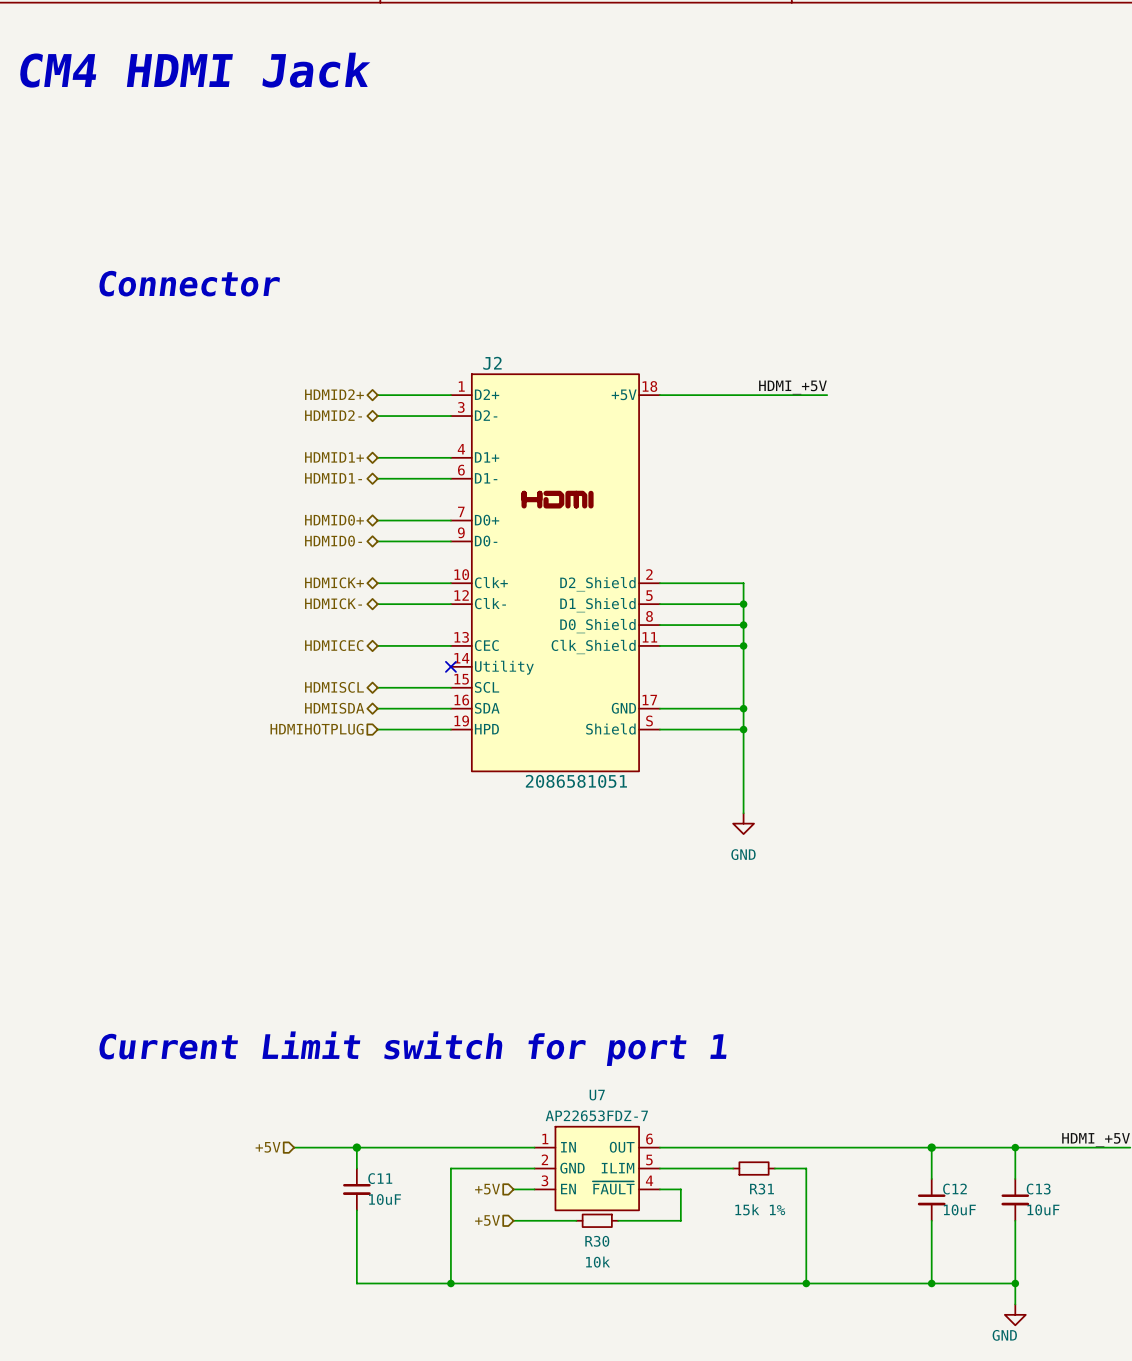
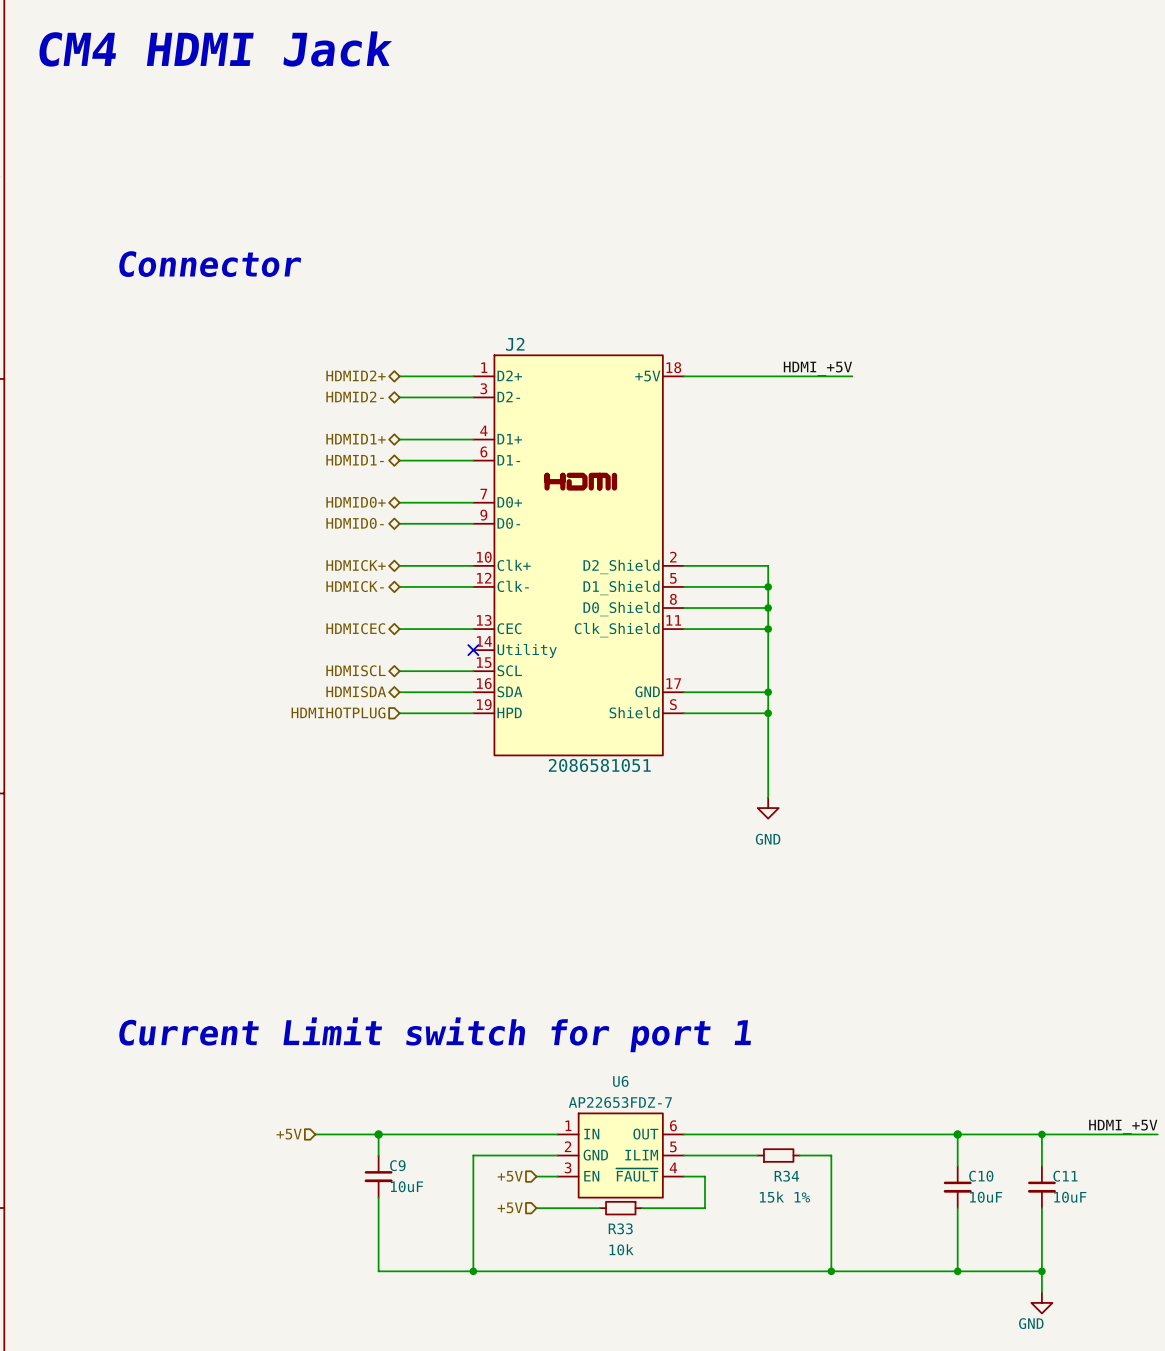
U7 name: U7 (597, 1095) -> U6 (620, 1081)
C11 name: C11 (380, 1178) -> C9 (397, 1165)
R31 name: R31 (762, 1189) -> R34 (786, 1176)
C12 name: C12 (954, 1189) -> C10 (981, 1176)
C13 name: C13 (1038, 1189) -> C11 (1065, 1176)
R30 name: R30 (597, 1241) -> R33 (620, 1228)

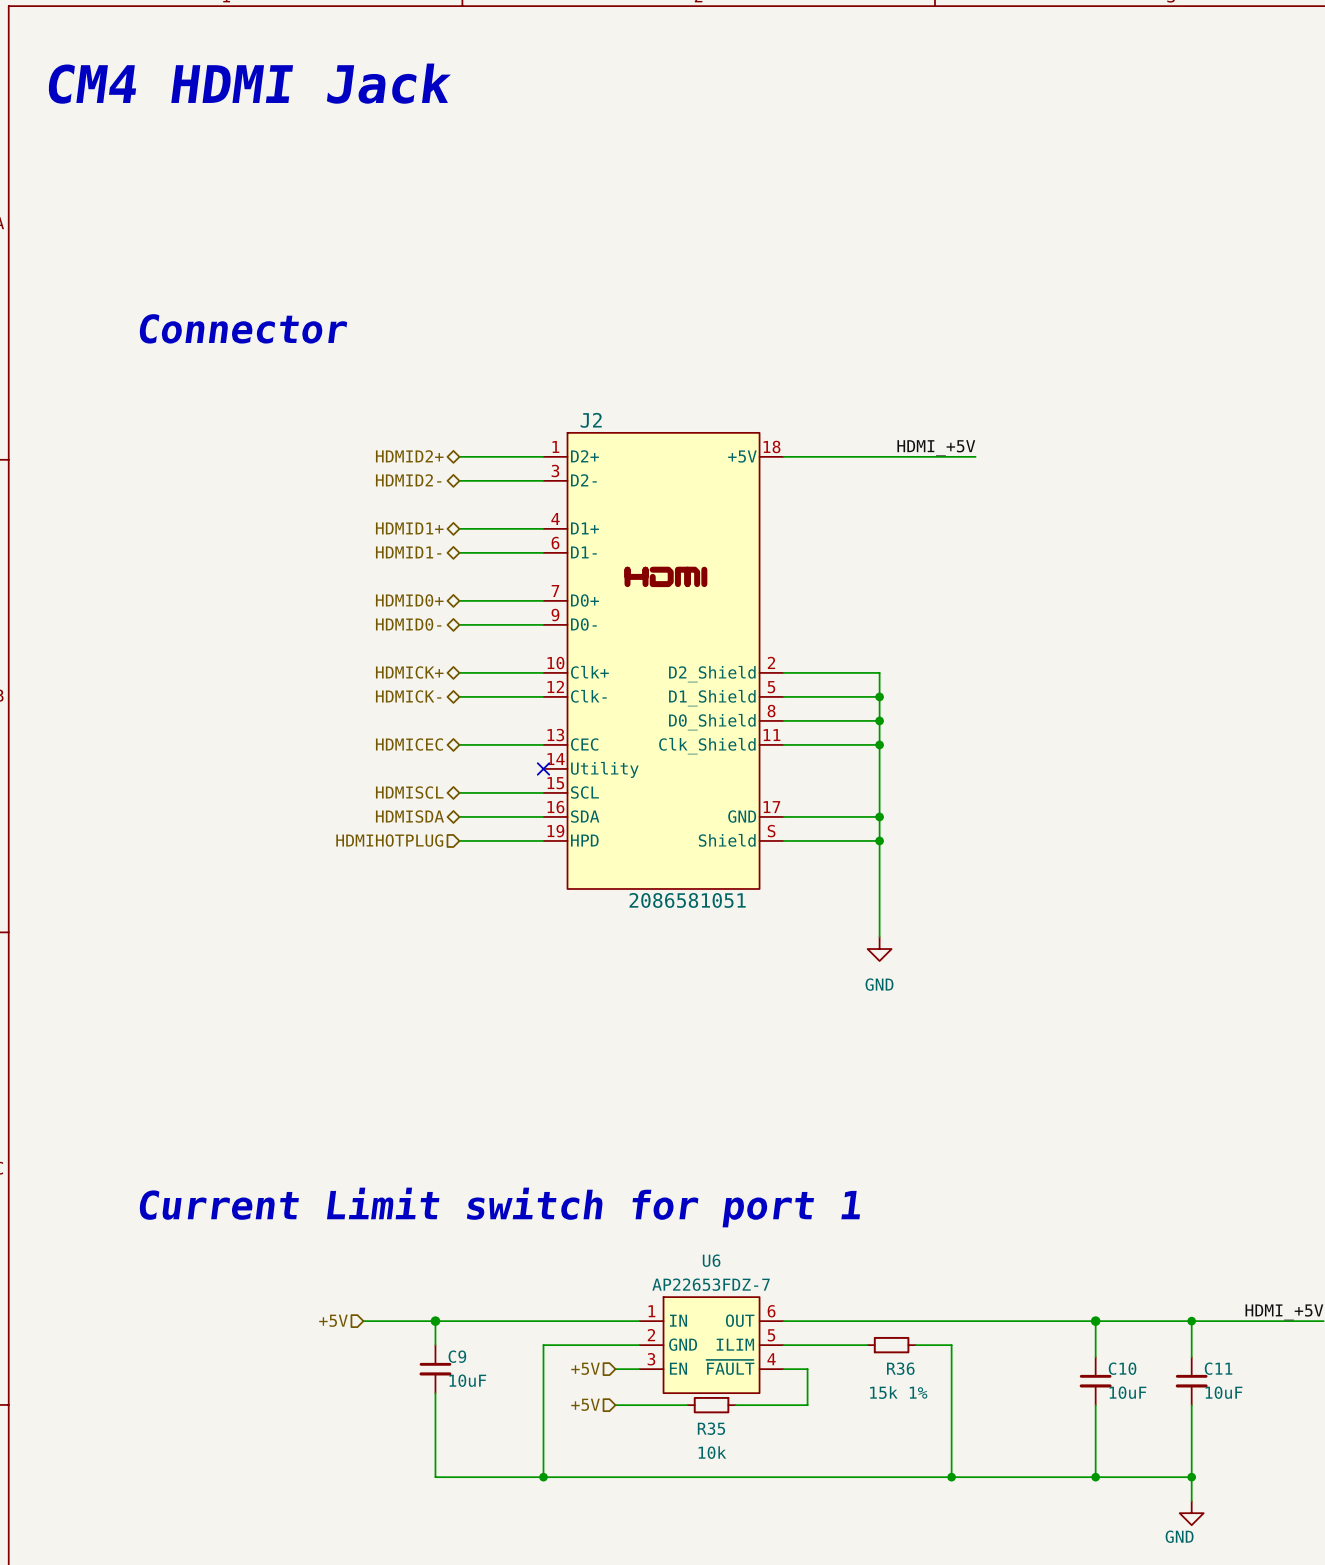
R34 name: R34 (786, 1176) -> R36 (900, 1368)
R33 name: R33 (620, 1228) -> R35 (711, 1428)

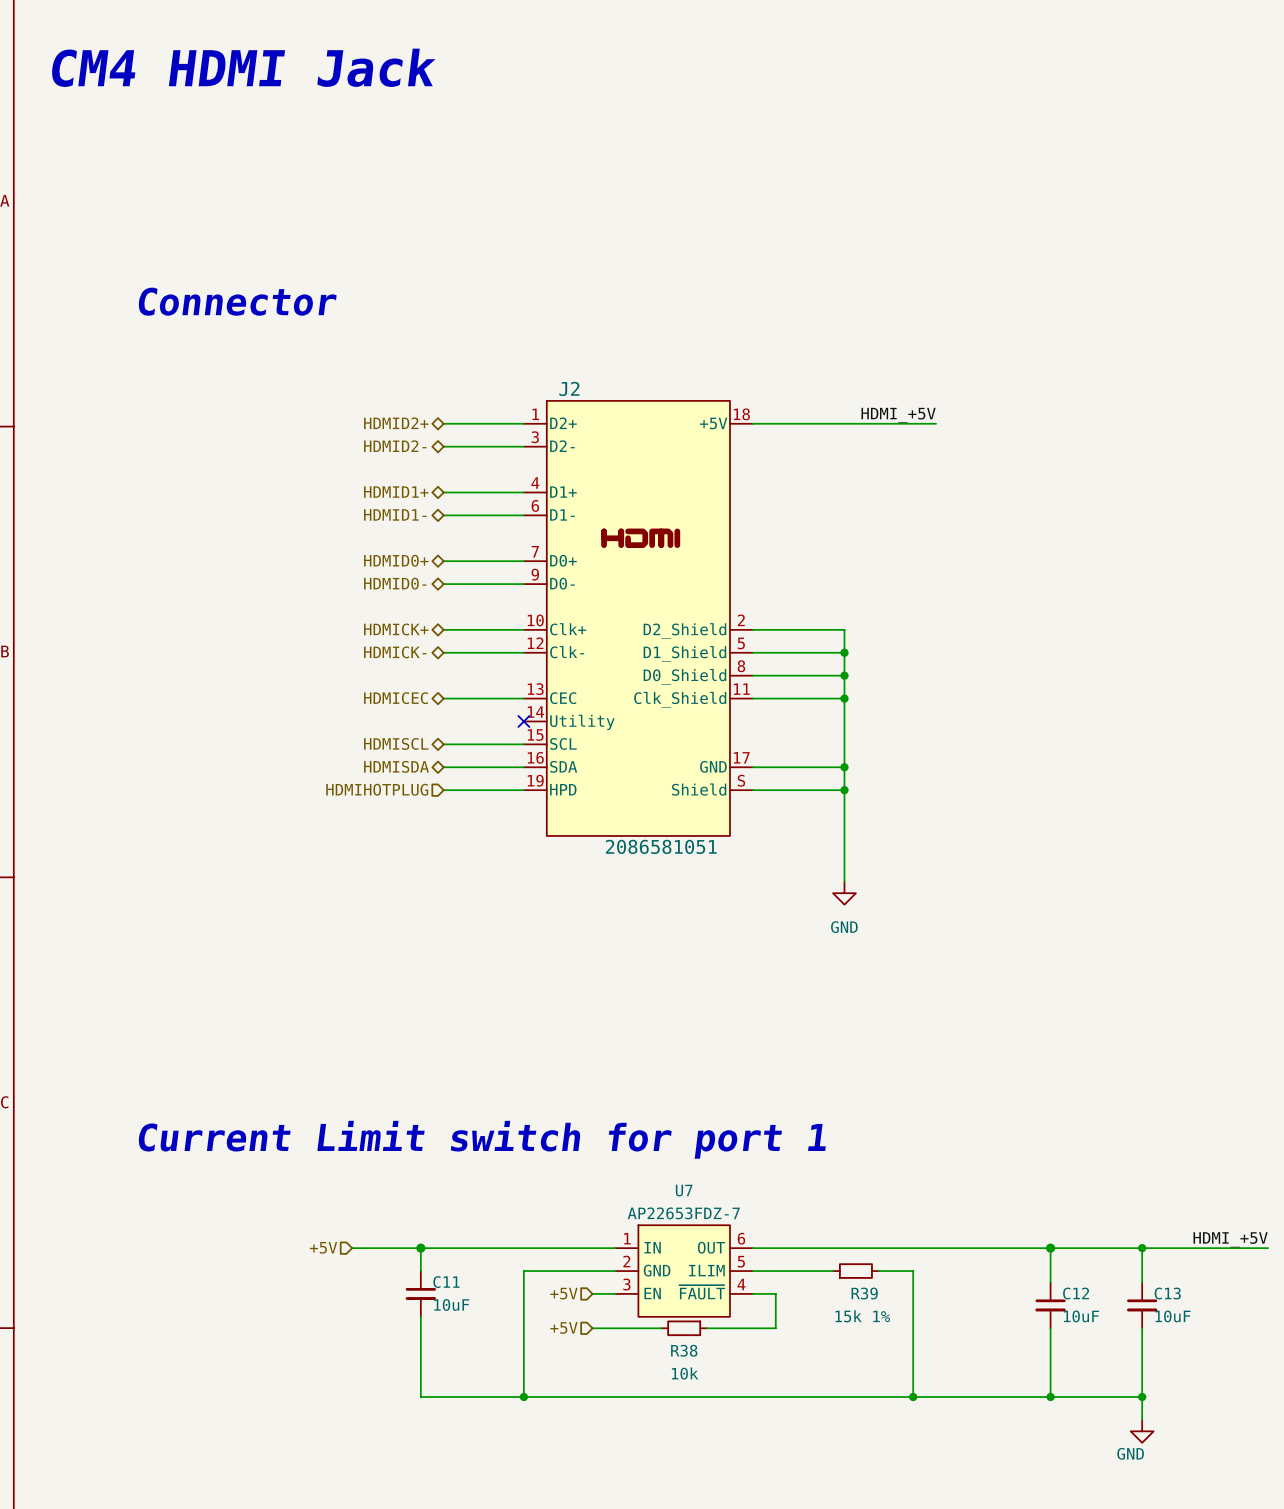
U6 name: U6 (711, 1260) -> U7 (684, 1190)
C9 name: C9 (457, 1356) -> C11 (446, 1282)
R36 name: R36 (900, 1368) -> R39 (864, 1293)
C10 name: C10 (1122, 1368) -> C12 (1076, 1293)
C11 name: C11 (1218, 1368) -> C13 (1167, 1293)
R35 name: R35 (711, 1428) -> R38 (684, 1350)

